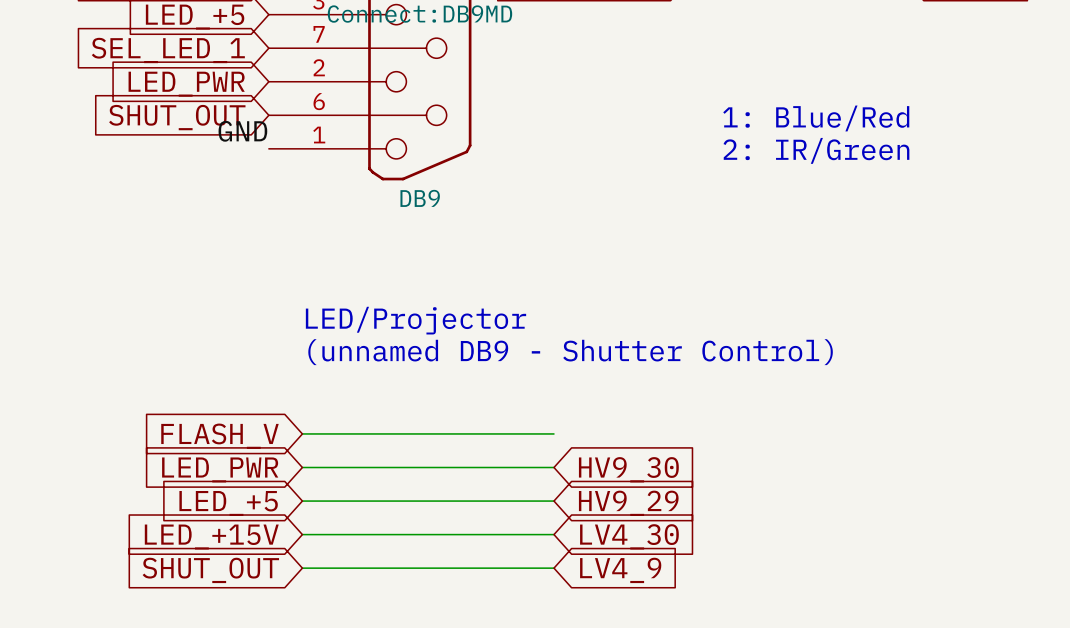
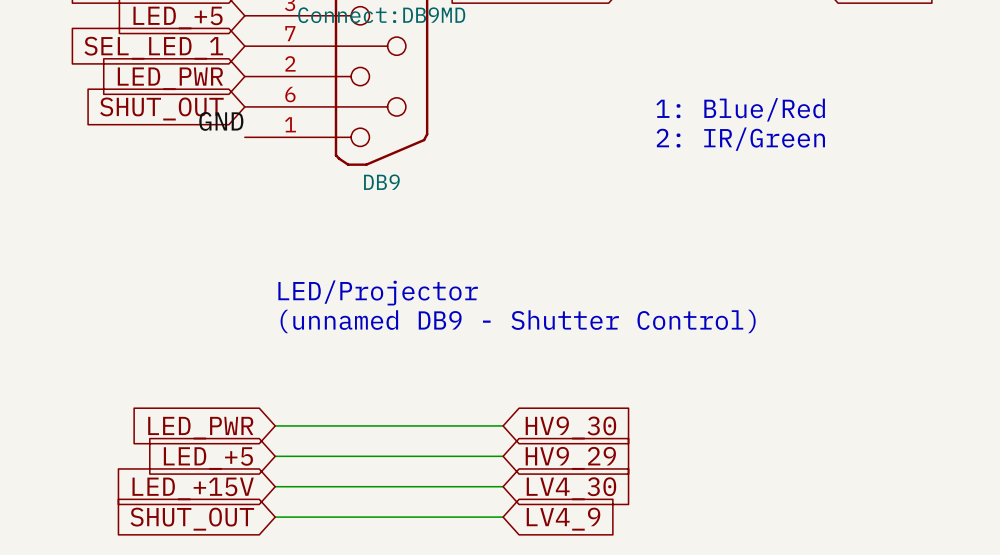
wire: (302, 433) (553, 433) -> none
global label: FLASH_V (219, 436) -> none

